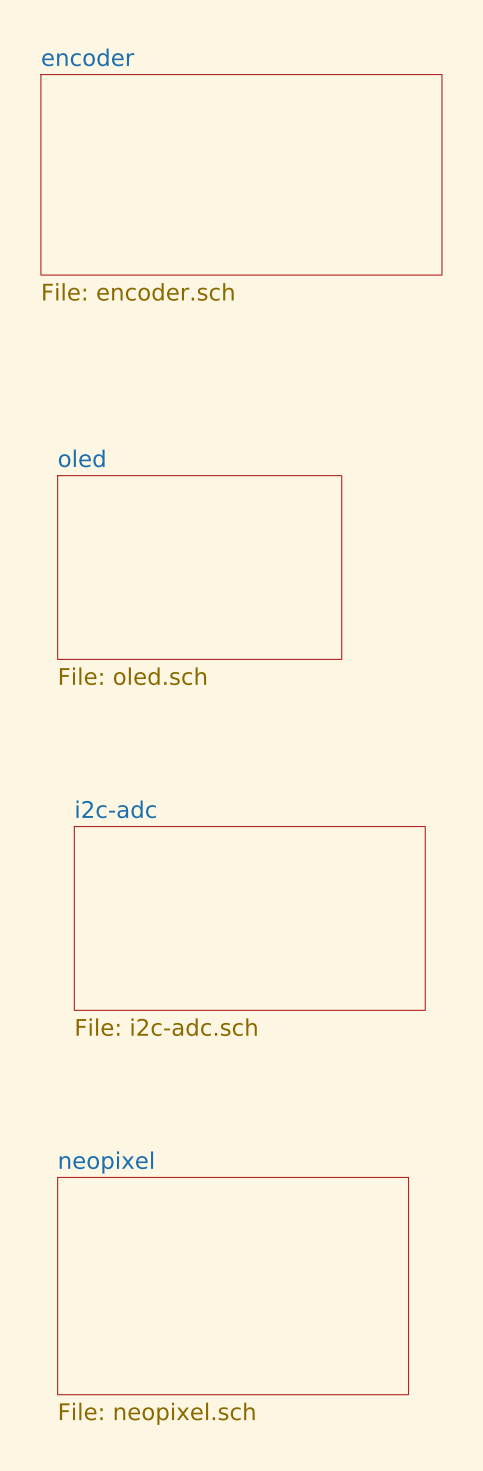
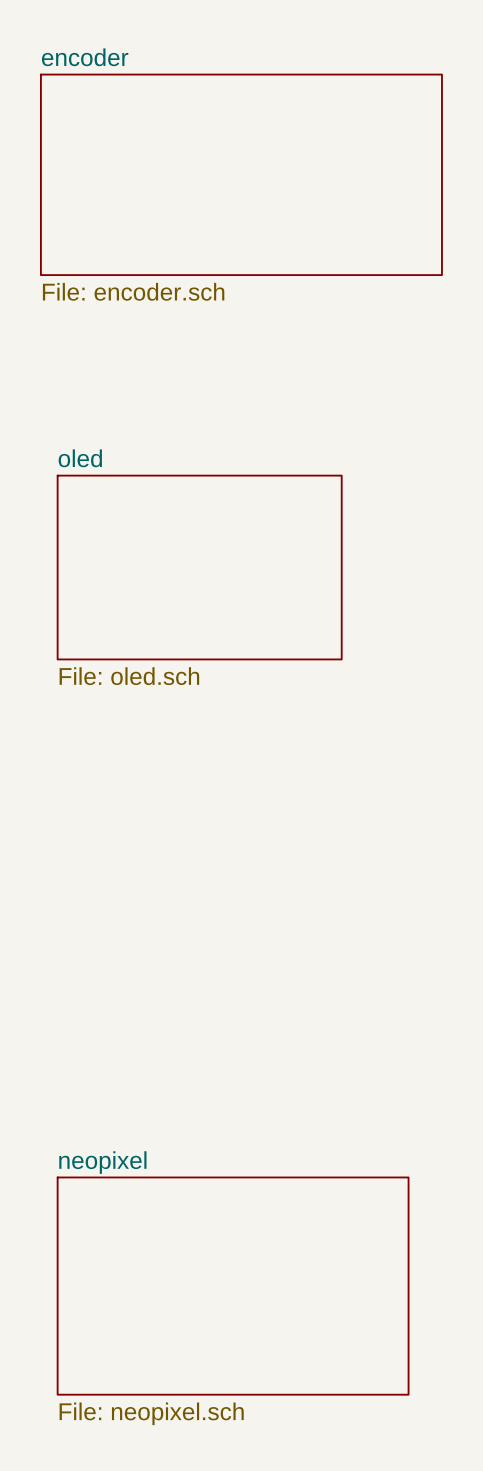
sheet i2c-adc: File: i2c-adc.sch (249, 918) -> none

